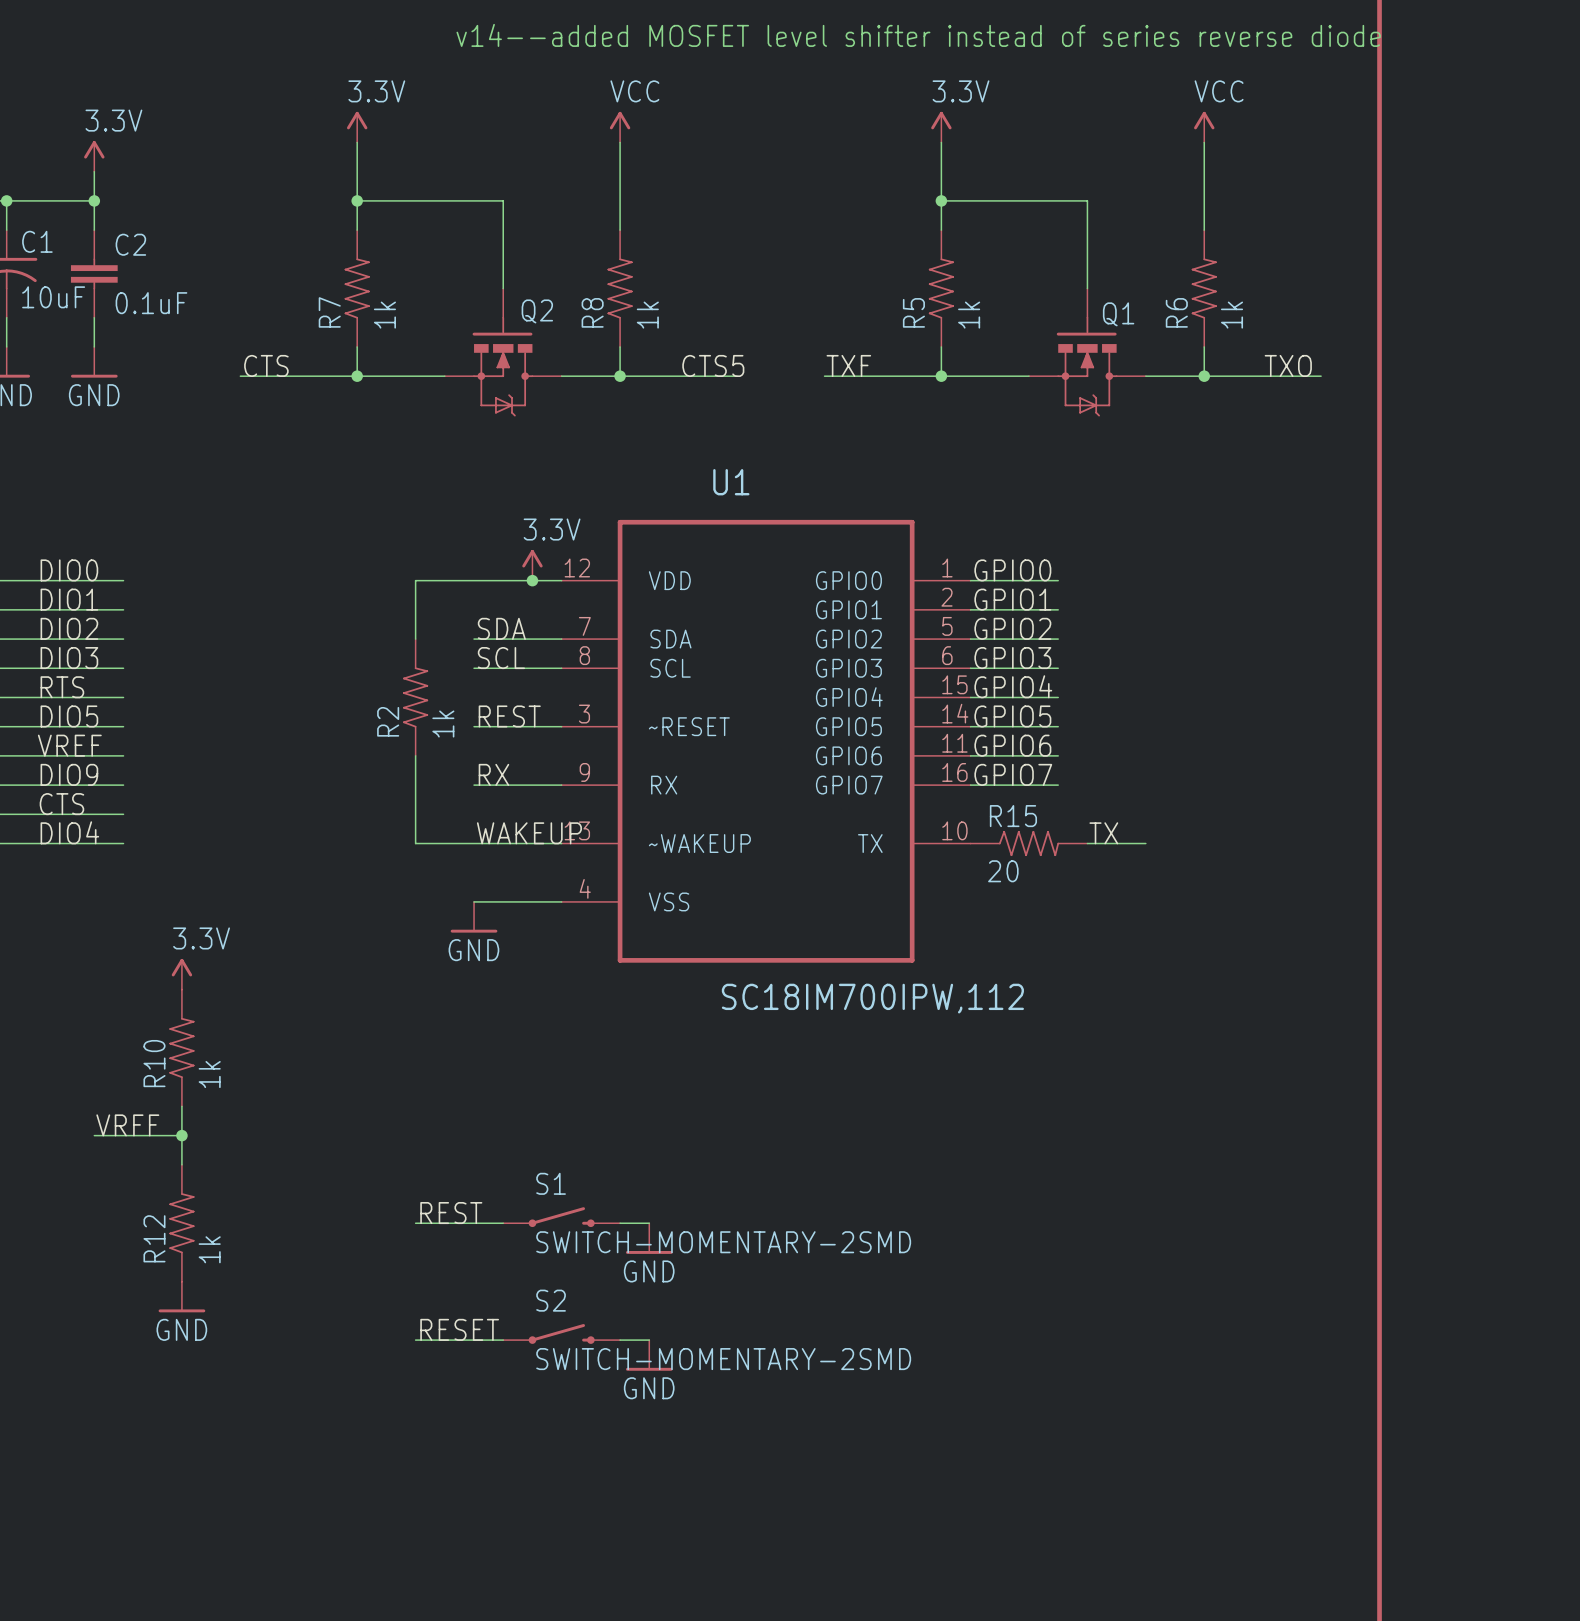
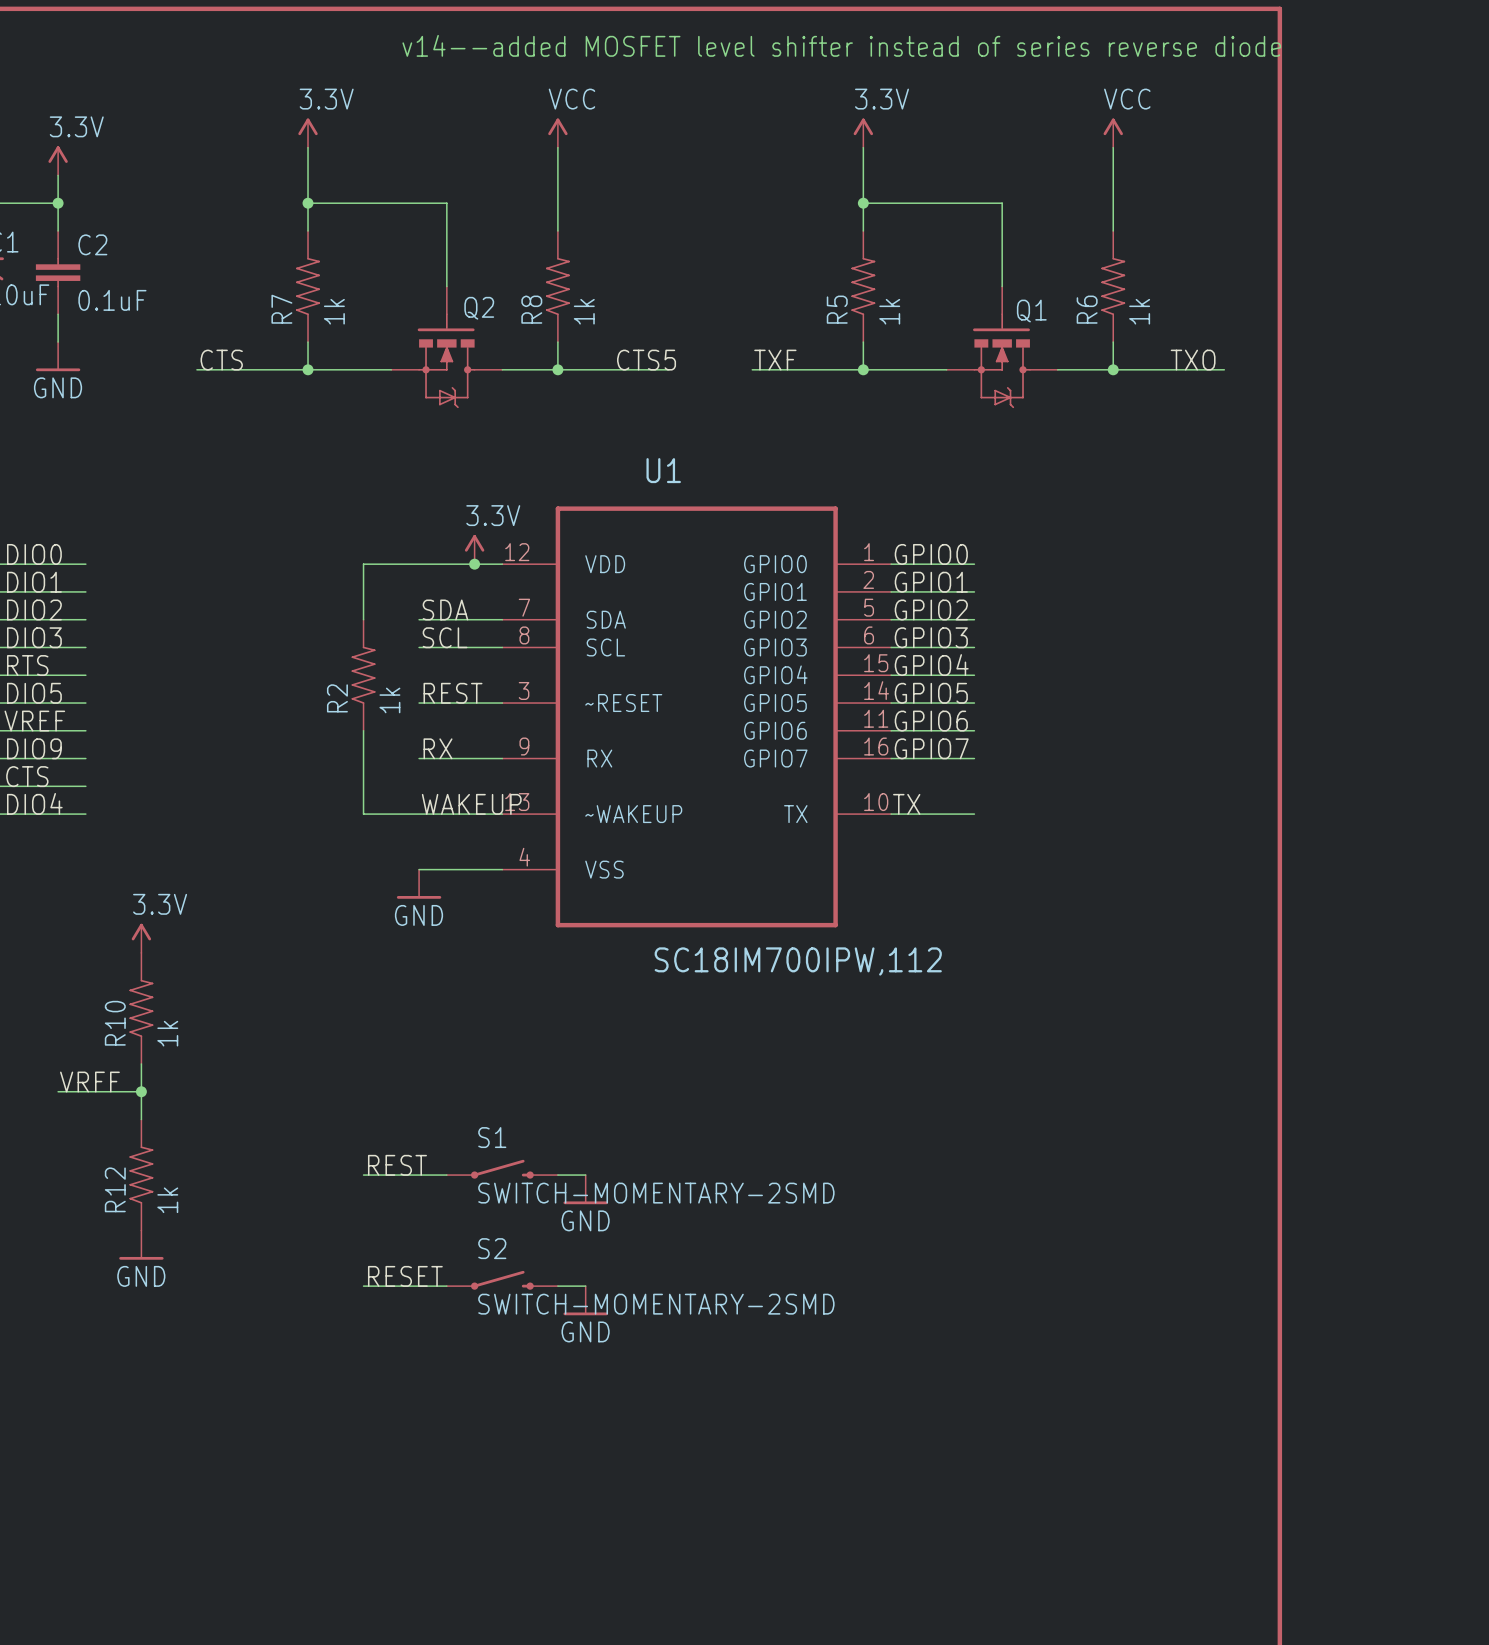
label position: TX (1103, 833) -> TX (906, 804)
R15: 20 (1029, 843) -> none
wire: (1087, 843) (1145, 843) -> none

